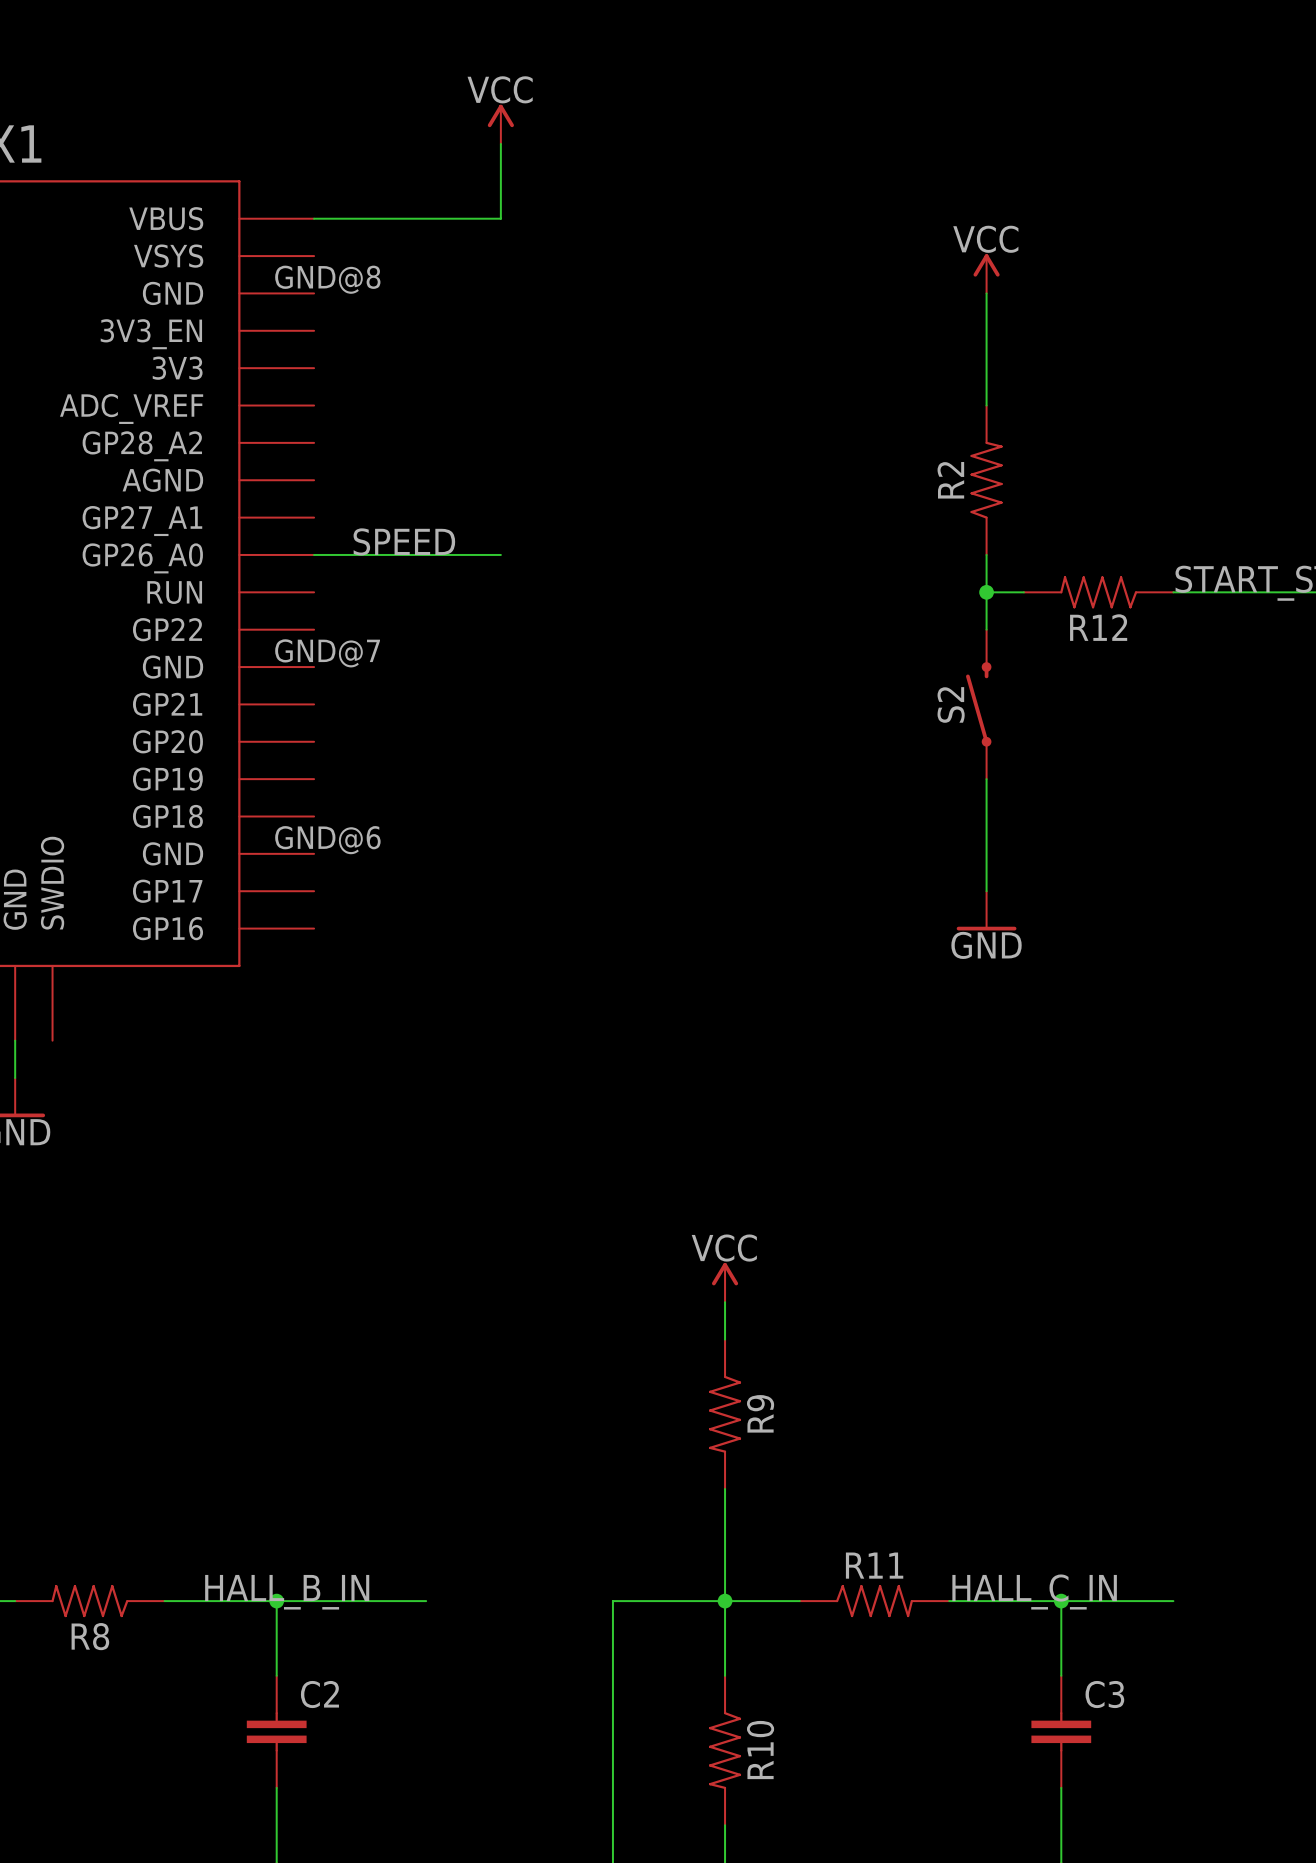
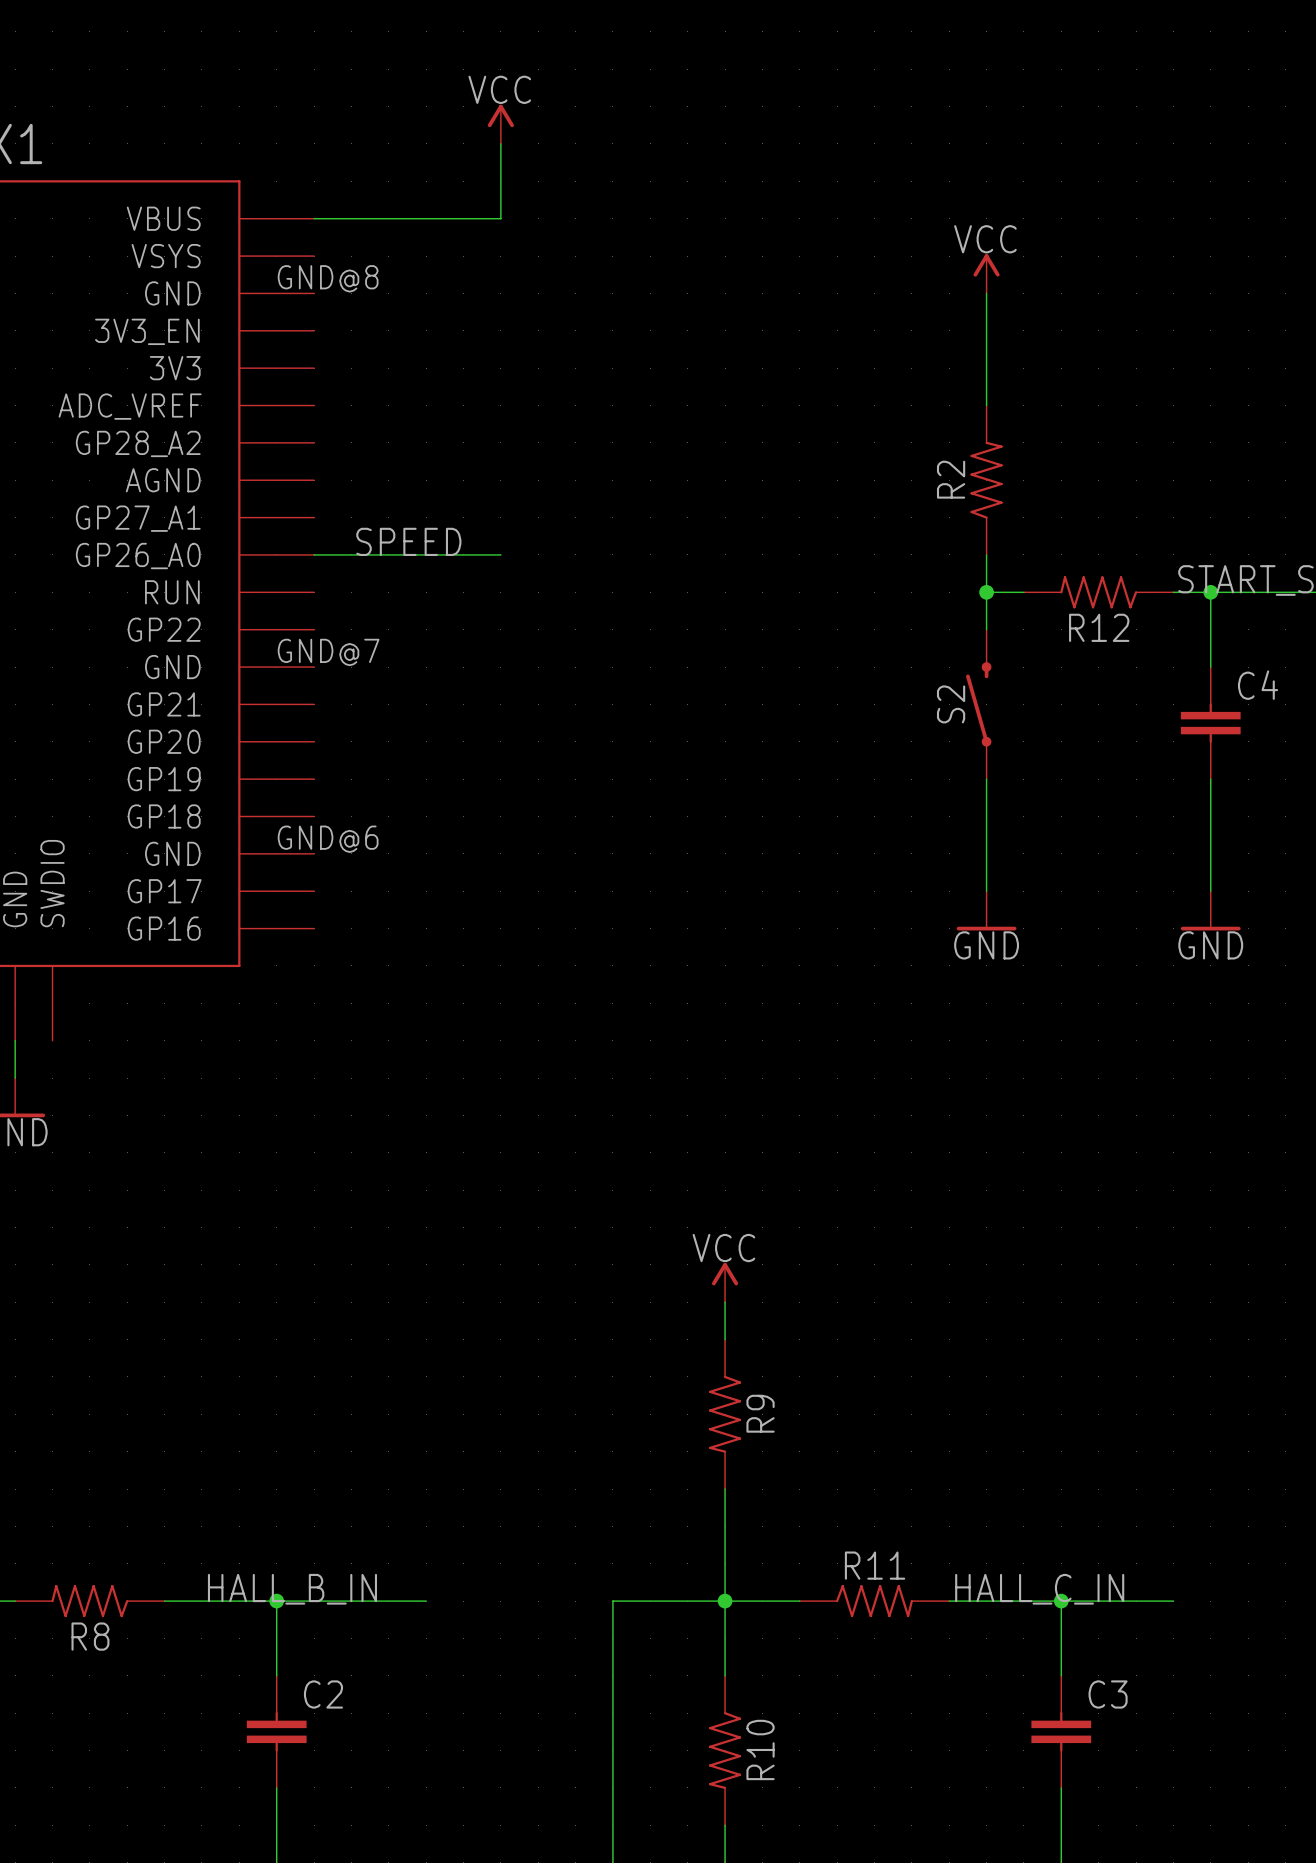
wire: none -> (1210, 592) (1210, 667)
junction: none -> (1210, 592)
C4: none -> (1210, 723)
wire: none -> (1210, 779) (1210, 891)
power symbol: none -> GND (1210, 910)

